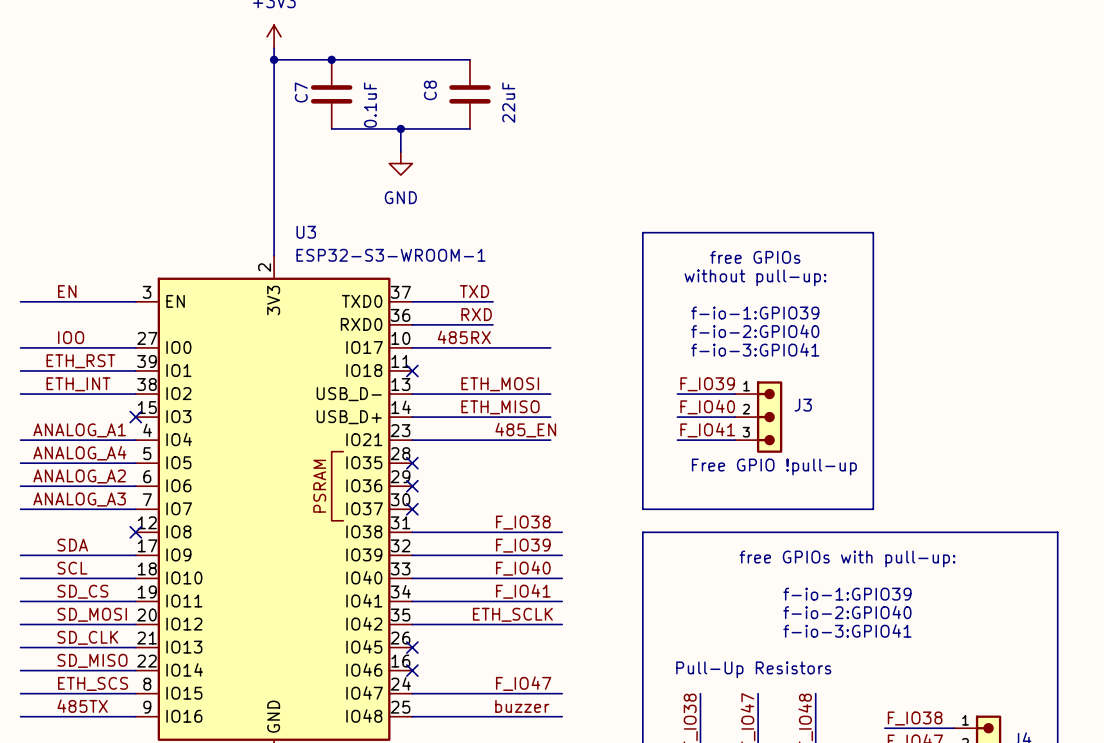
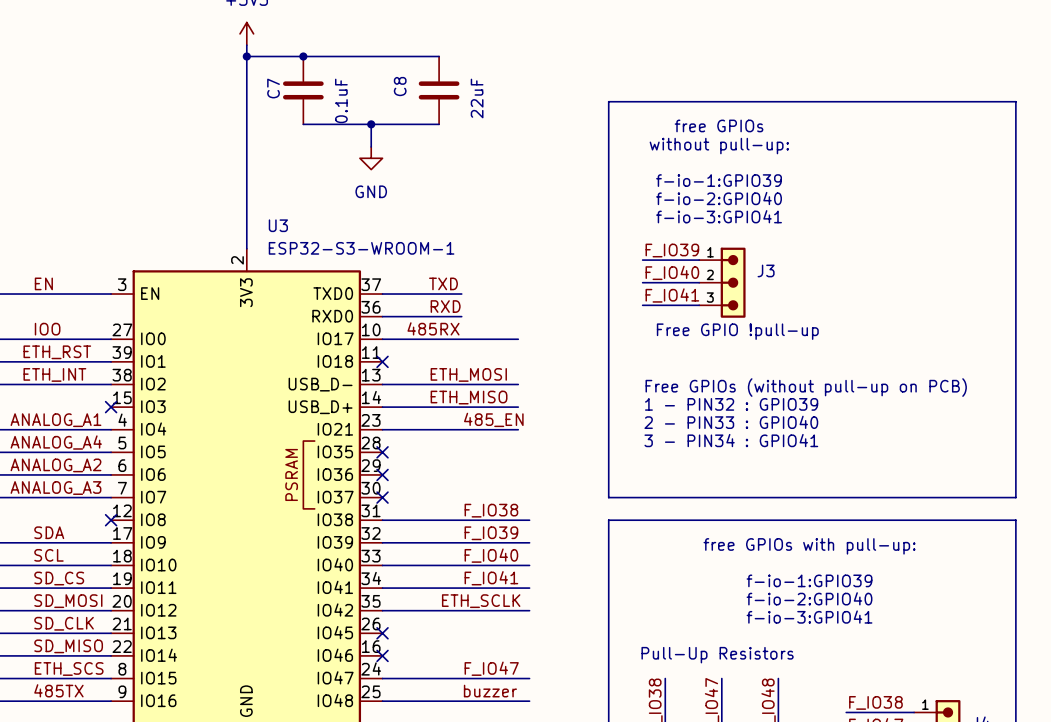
line: (642, 232) (873, 232) (873, 509) -> (608, 226) (608, 101) (1015, 101) (1015, 497) (834, 497)
text position: free GPIOs (755, 257) -> free GPIOs (719, 125)
text position: without pull-up: (755, 277) -> without pull-up: (719, 146)
text position: f-io-1:GPIO39 (755, 313) -> f-io-1:GPIO39 (719, 180)
text position: f-io-2:GPIO40 (755, 331) -> f-io-2:GPIO40 (719, 198)
text position: f-io-3:GPIO41 (755, 349) -> f-io-3:GPIO41 (719, 216)
label position: F_IO39 (707, 384) -> F_IO39 (672, 250)
wire: (677, 394) (735, 394) -> (642, 260) (699, 260)
text: none -> Free GPIOs (without pull-up on PCB) (806, 387)
label position: F_IO40 (707, 407) -> F_IO40 (672, 272)
text: none -> 1 - PIN32 : GPIO39 (731, 404)
wire: (677, 417) (735, 417) -> (642, 282) (699, 282)
J3 position: (758, 417) -> (722, 282)
label position: F_IO41 (707, 430) -> F_IO41 (672, 295)
text: none -> 2 - PIN33 : GPIO40 (731, 422)
wire: (677, 440) (735, 440) -> (642, 305) (699, 305)
text: none -> 3 - PIN34 : GPIO41 (731, 440)

